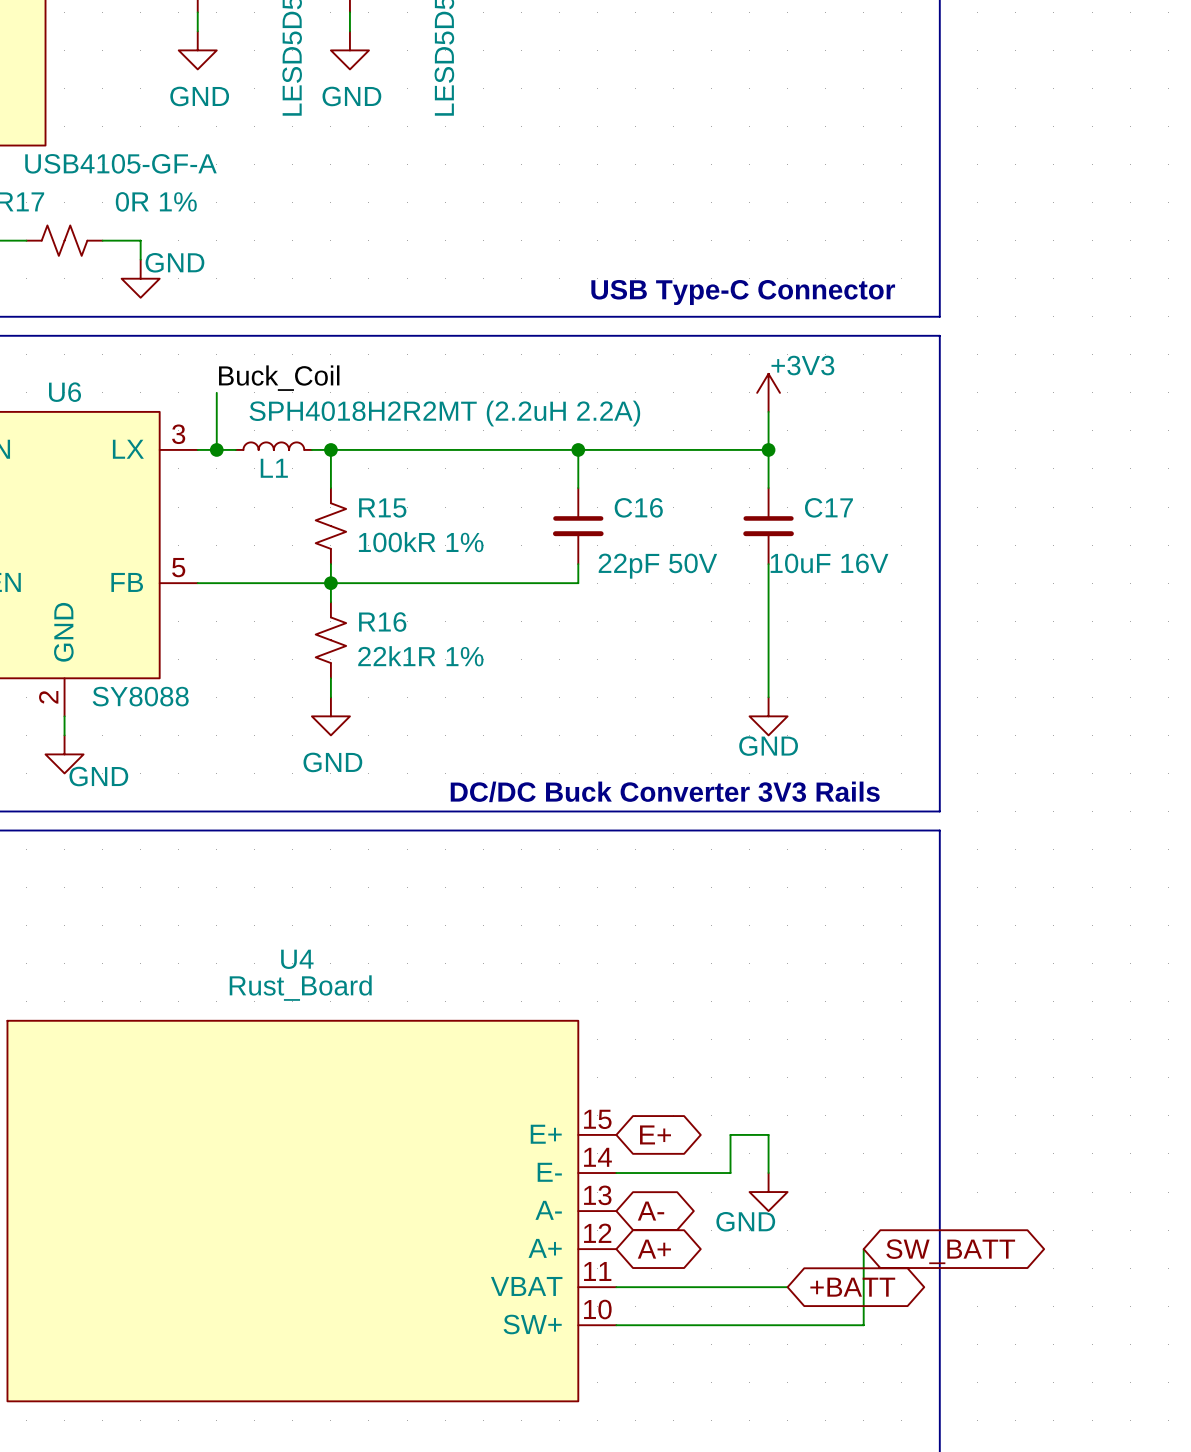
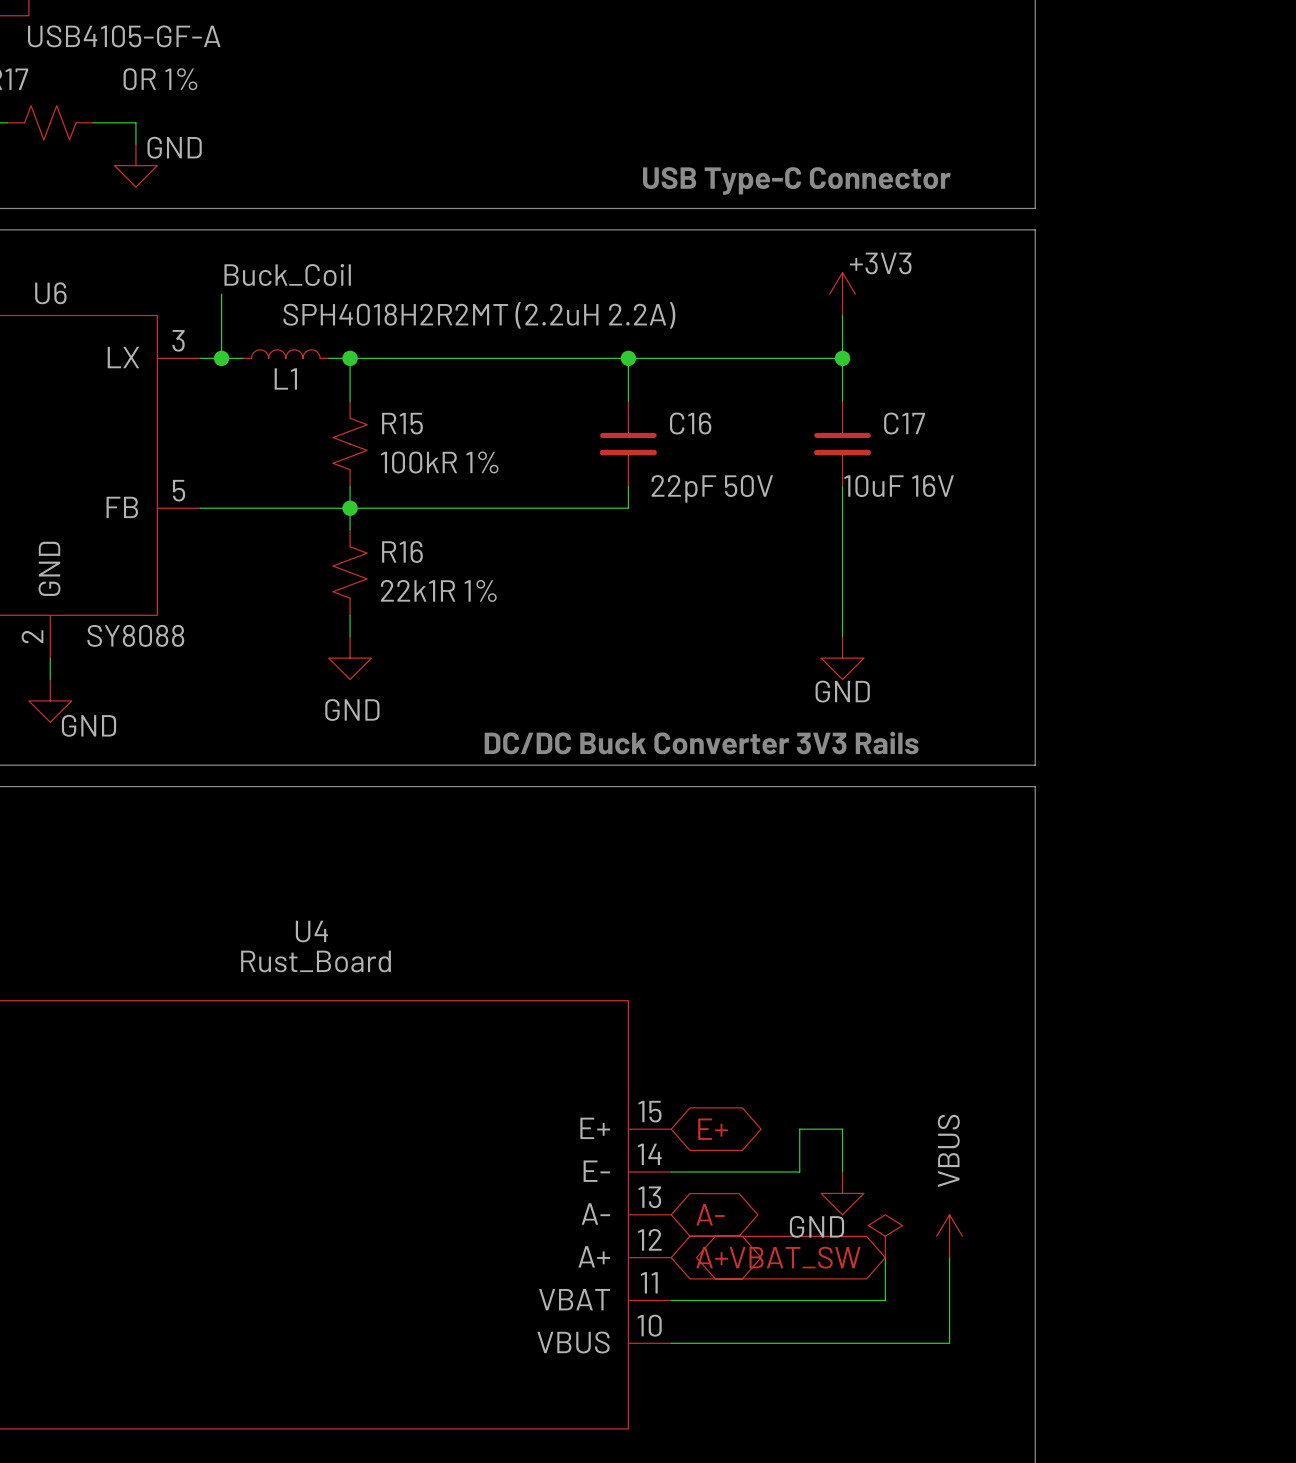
power symbol: none -> (885, 1236)
power symbol: none -> VBUS (949, 1236)
wire: none -> (885, 1257) (885, 1300) (863, 1300)
global label: none -> VBAT_SW (795, 1257)
global label: SW_BATT (950, 1251) -> none
global label: +BATT (852, 1287) -> none
U4 pin name: SW+ (532, 1324) -> VBUS (573, 1342)

